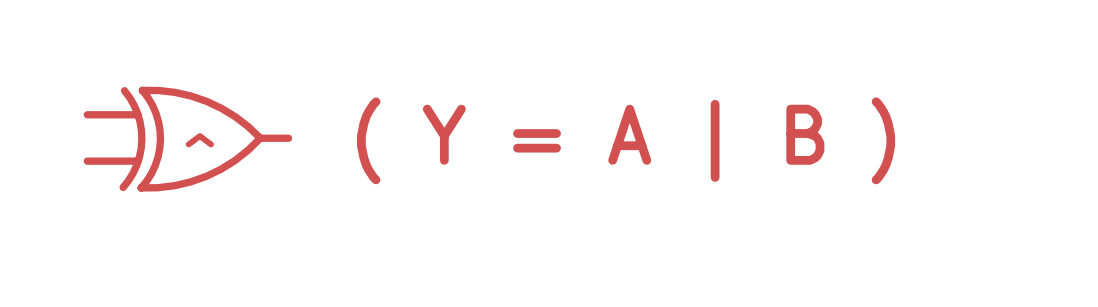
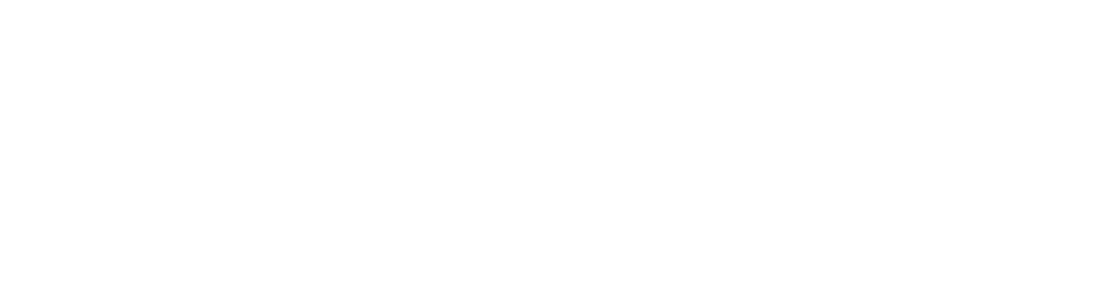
track: (124, 90) (137, 113) (141, 139) (136, 165) (123, 187) -> none
track: (87, 114) (137, 114) -> none
track: (260, 138) (235, 160) (206, 176) (174, 185) (141, 187) (155, 165) (160, 139) (155, 113) (142, 90) (158, 90) (191, 96) (221, 108) (235, 116) (260, 138) (288, 138) -> none
text: ^ (199, 140) -> none
text: ( Y = A | B ) (626, 140) -> none
track: (87, 161) (137, 161) -> none

